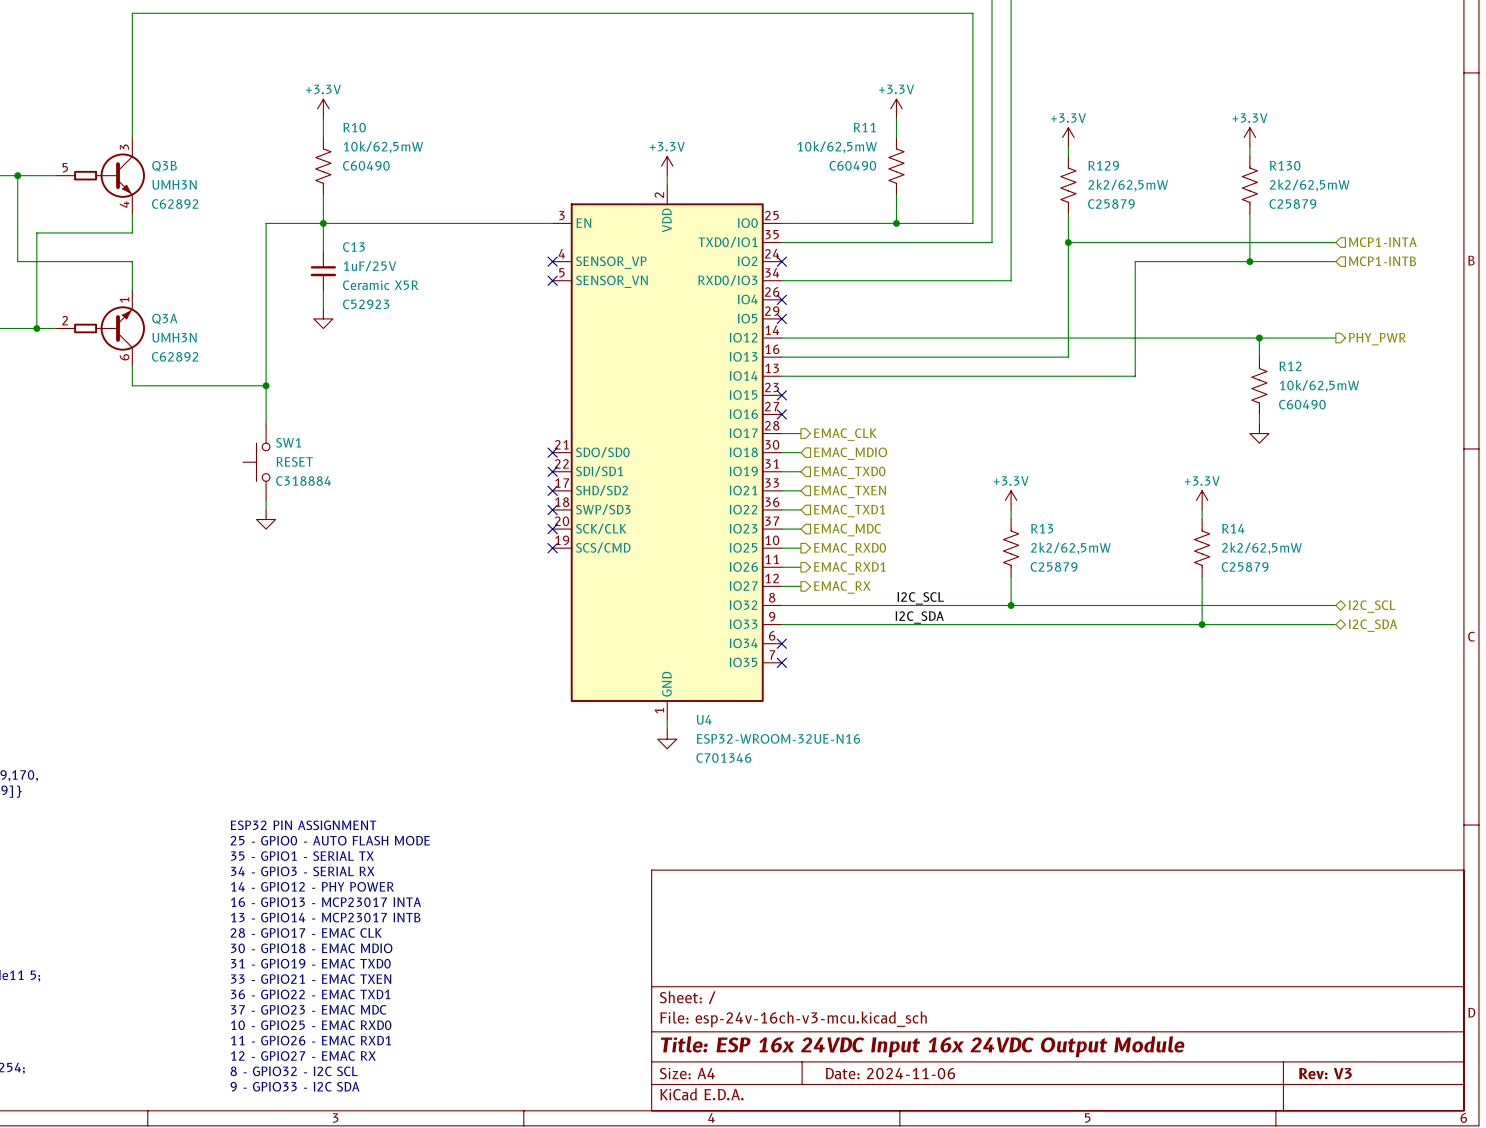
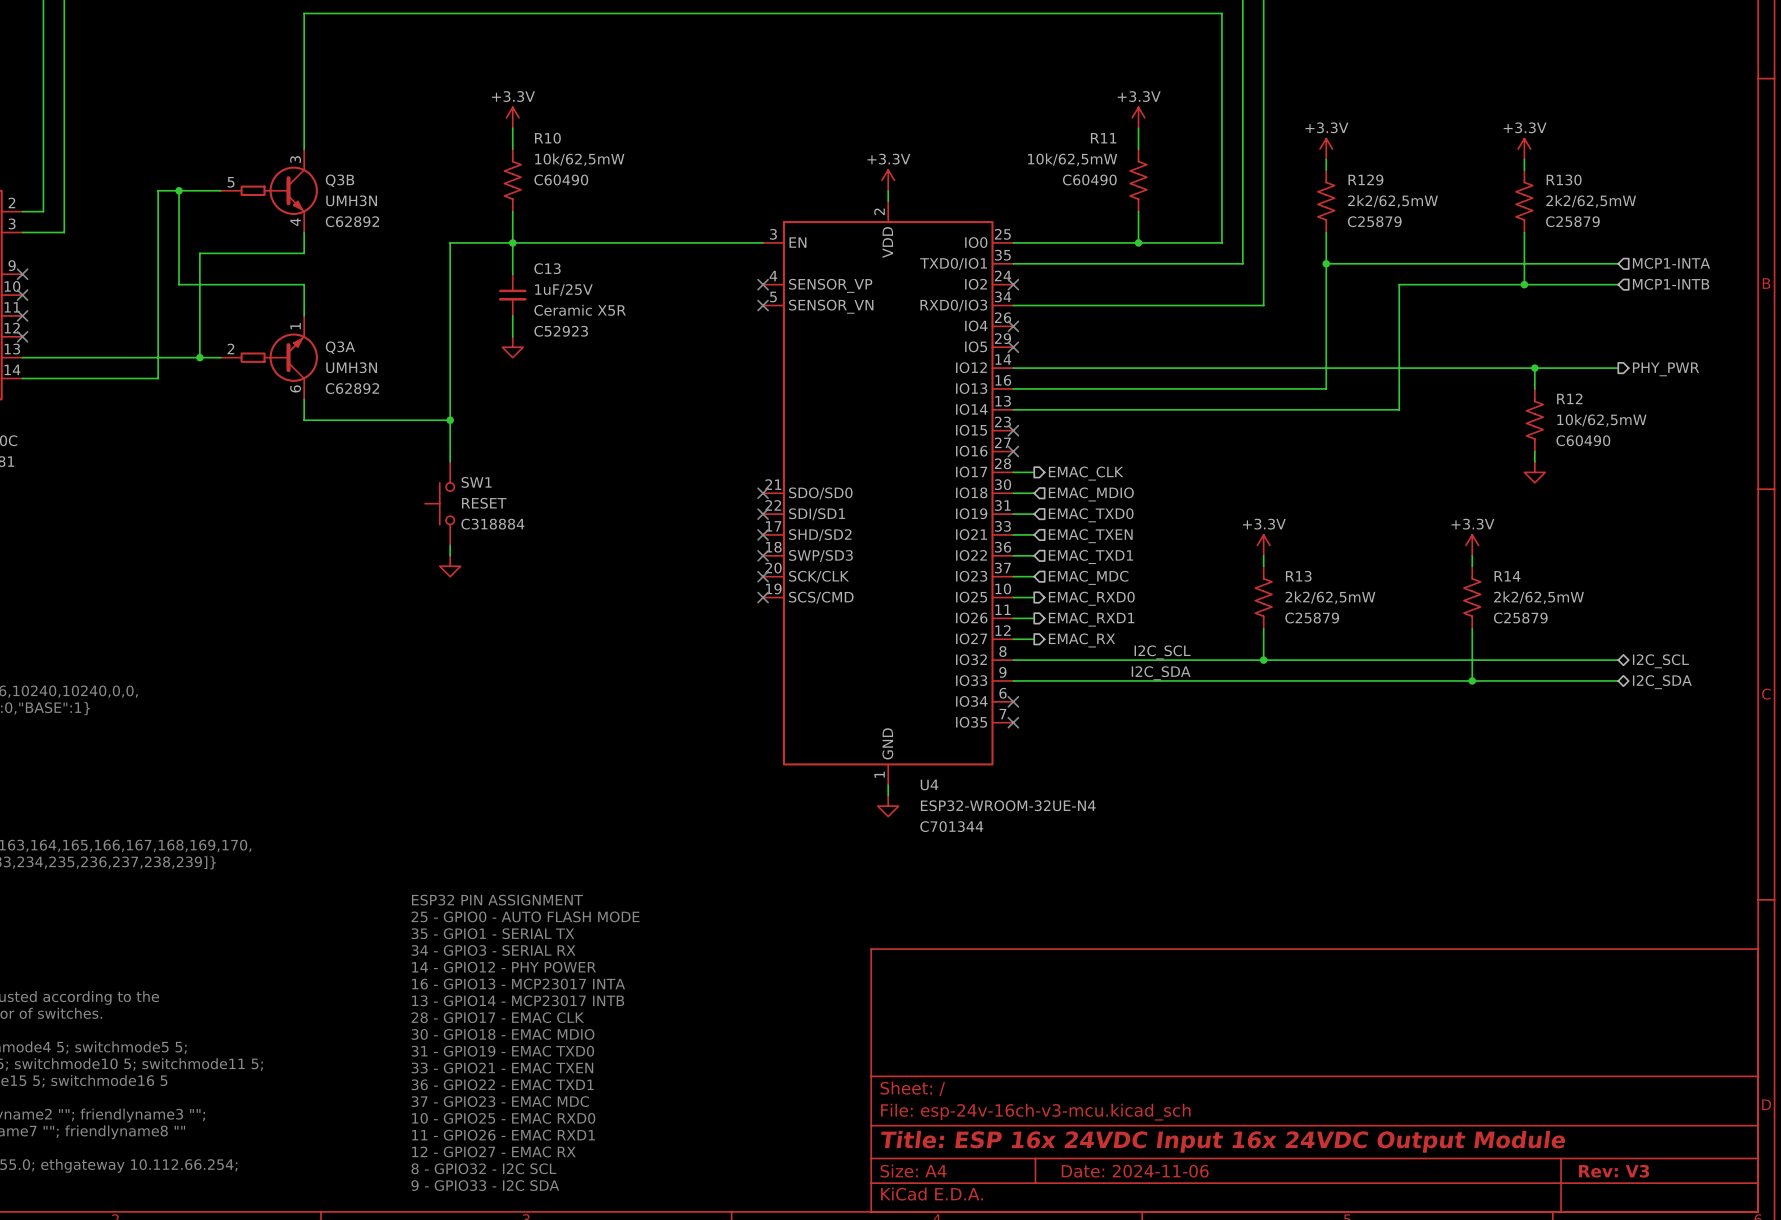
U4 value: ESP32-WROOM-32UE-N16 (778, 738) -> ESP32-WROOM-32UE-N4 (1008, 805)
U4 text: C701346 (723, 758) -> C701344 (951, 826)

